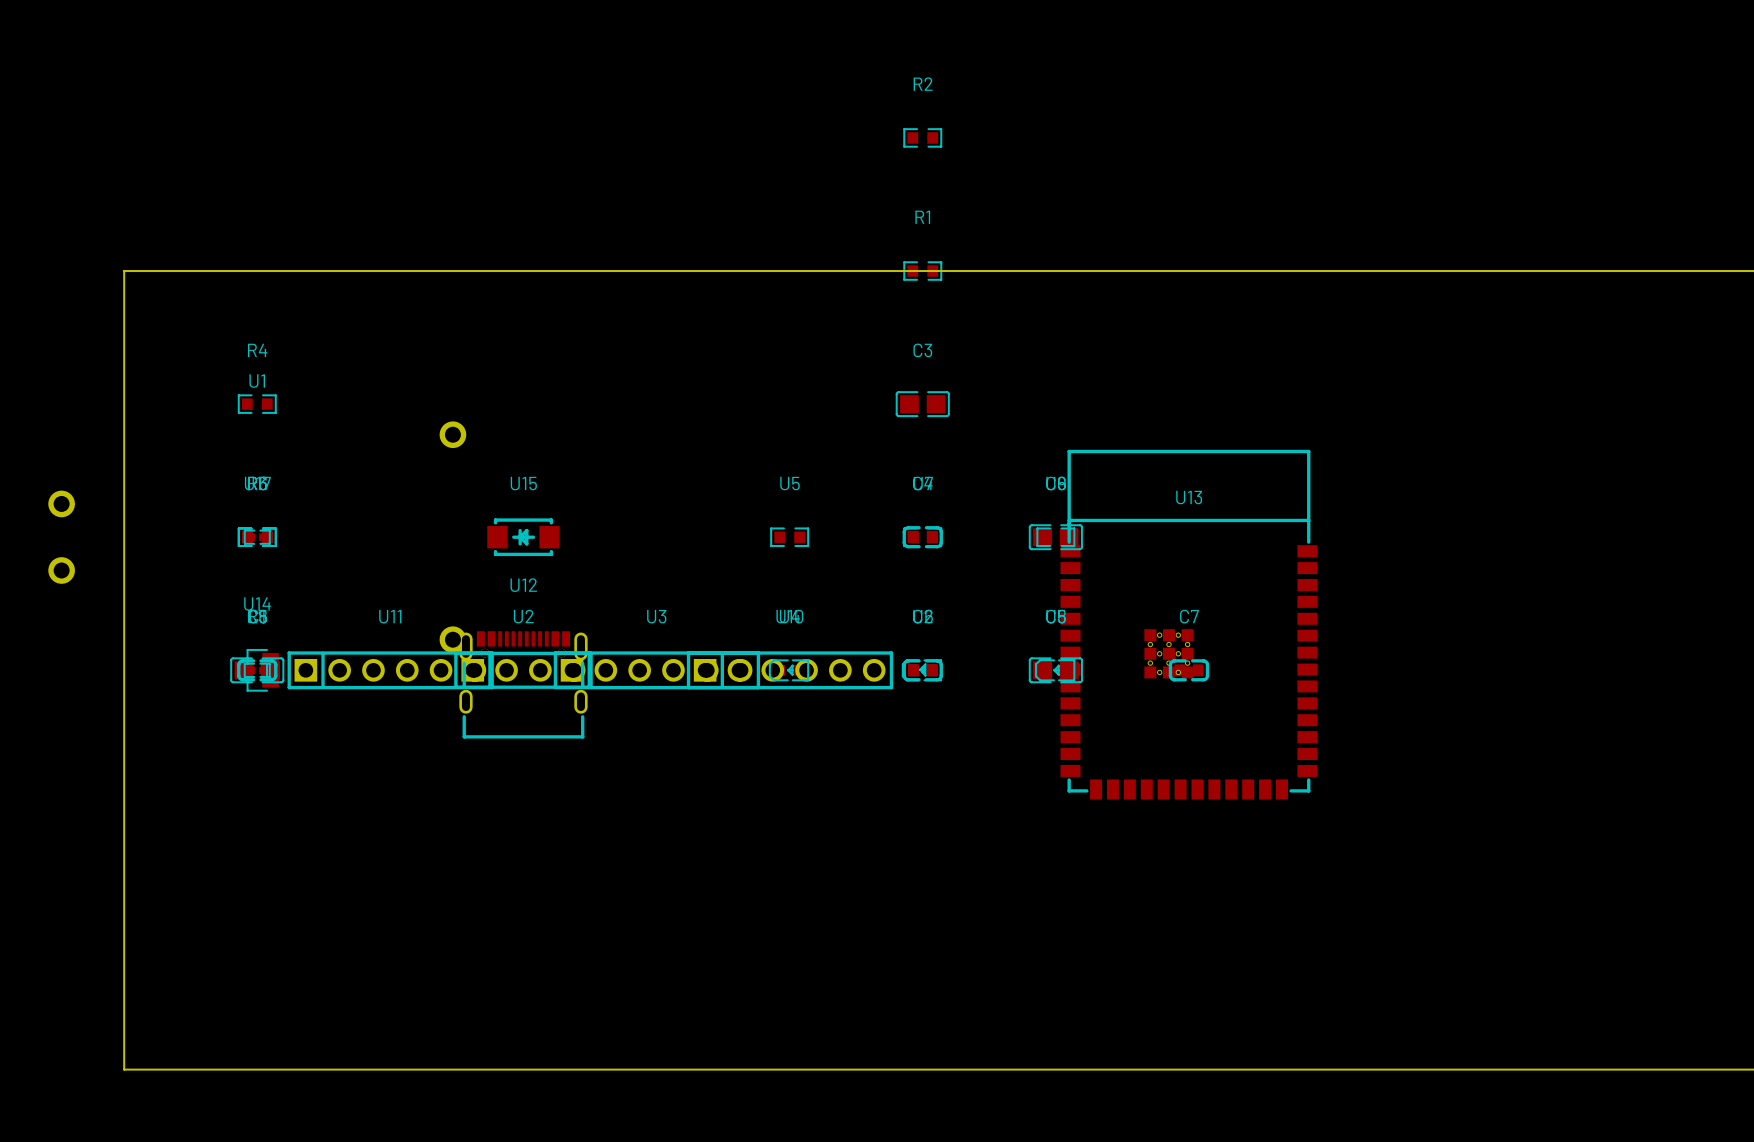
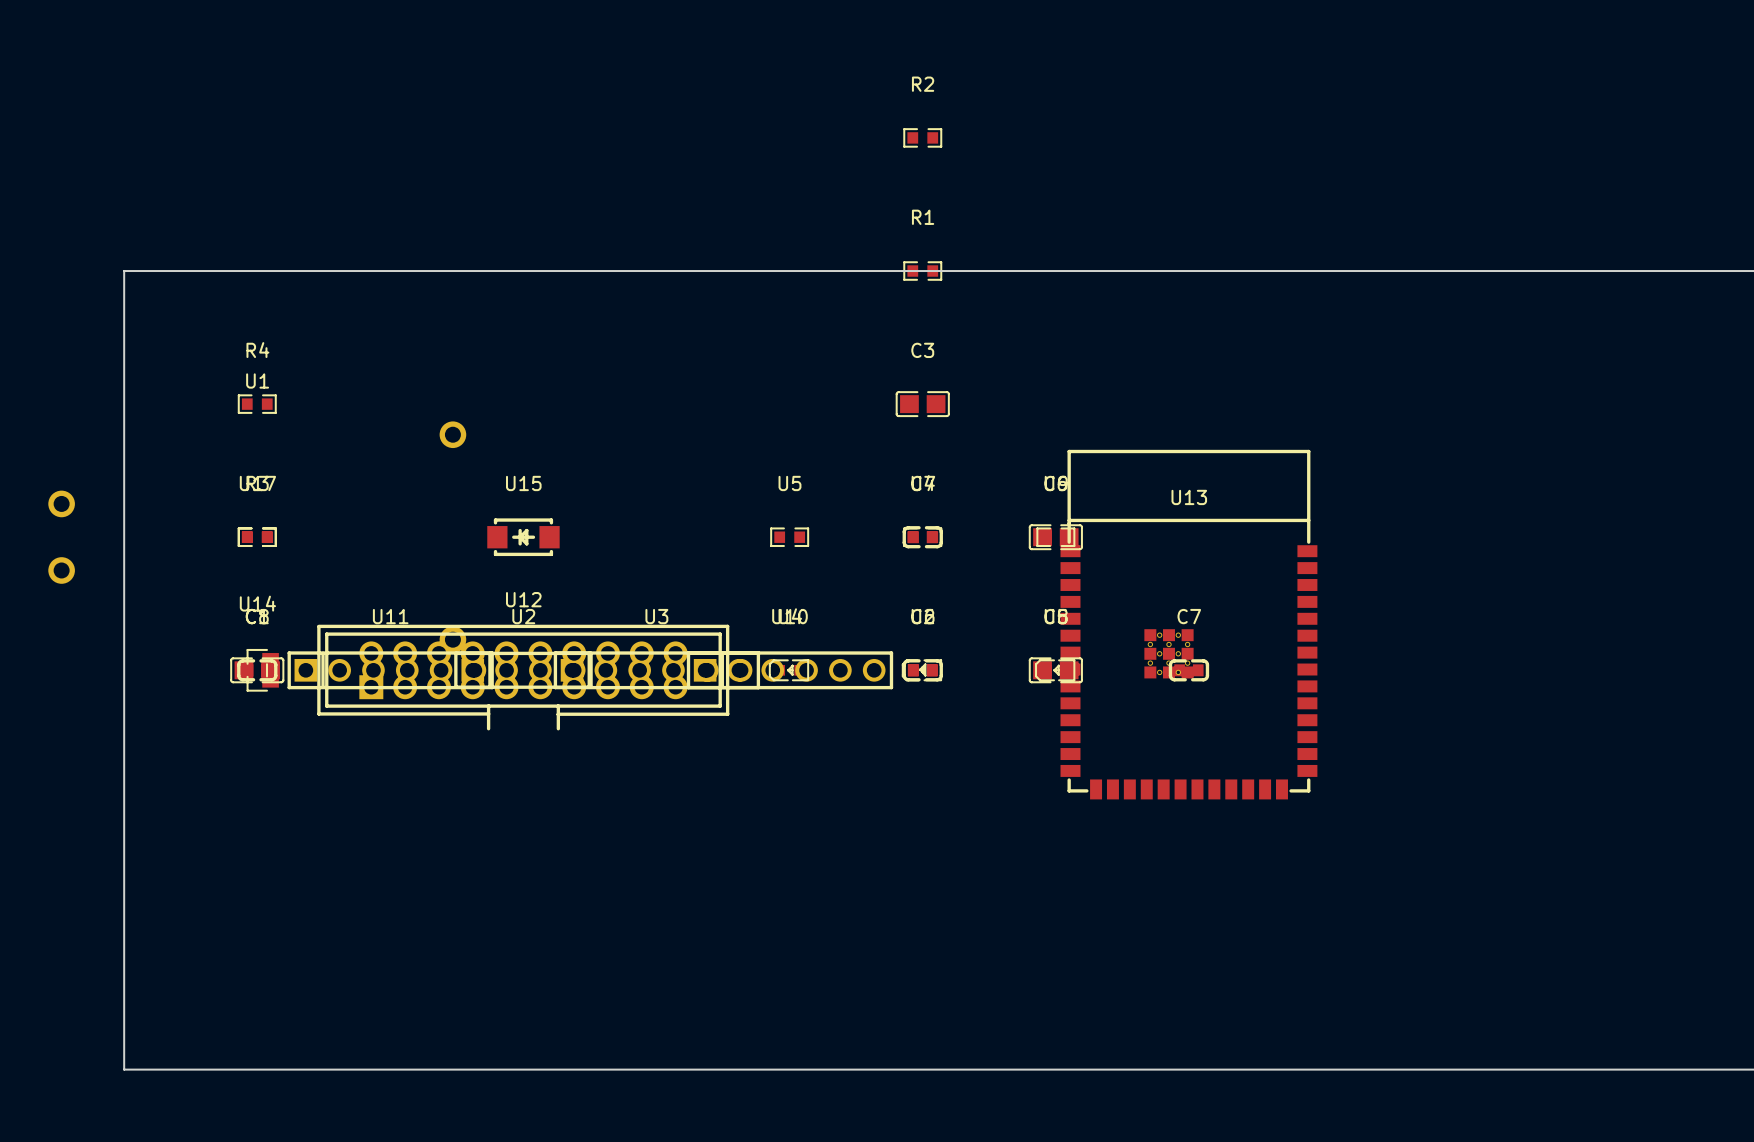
part: (257, 537) -> none
U12 footprint: [459, 631, 588, 739] -> [317, 624, 730, 731]
part: (257, 670) -> none

